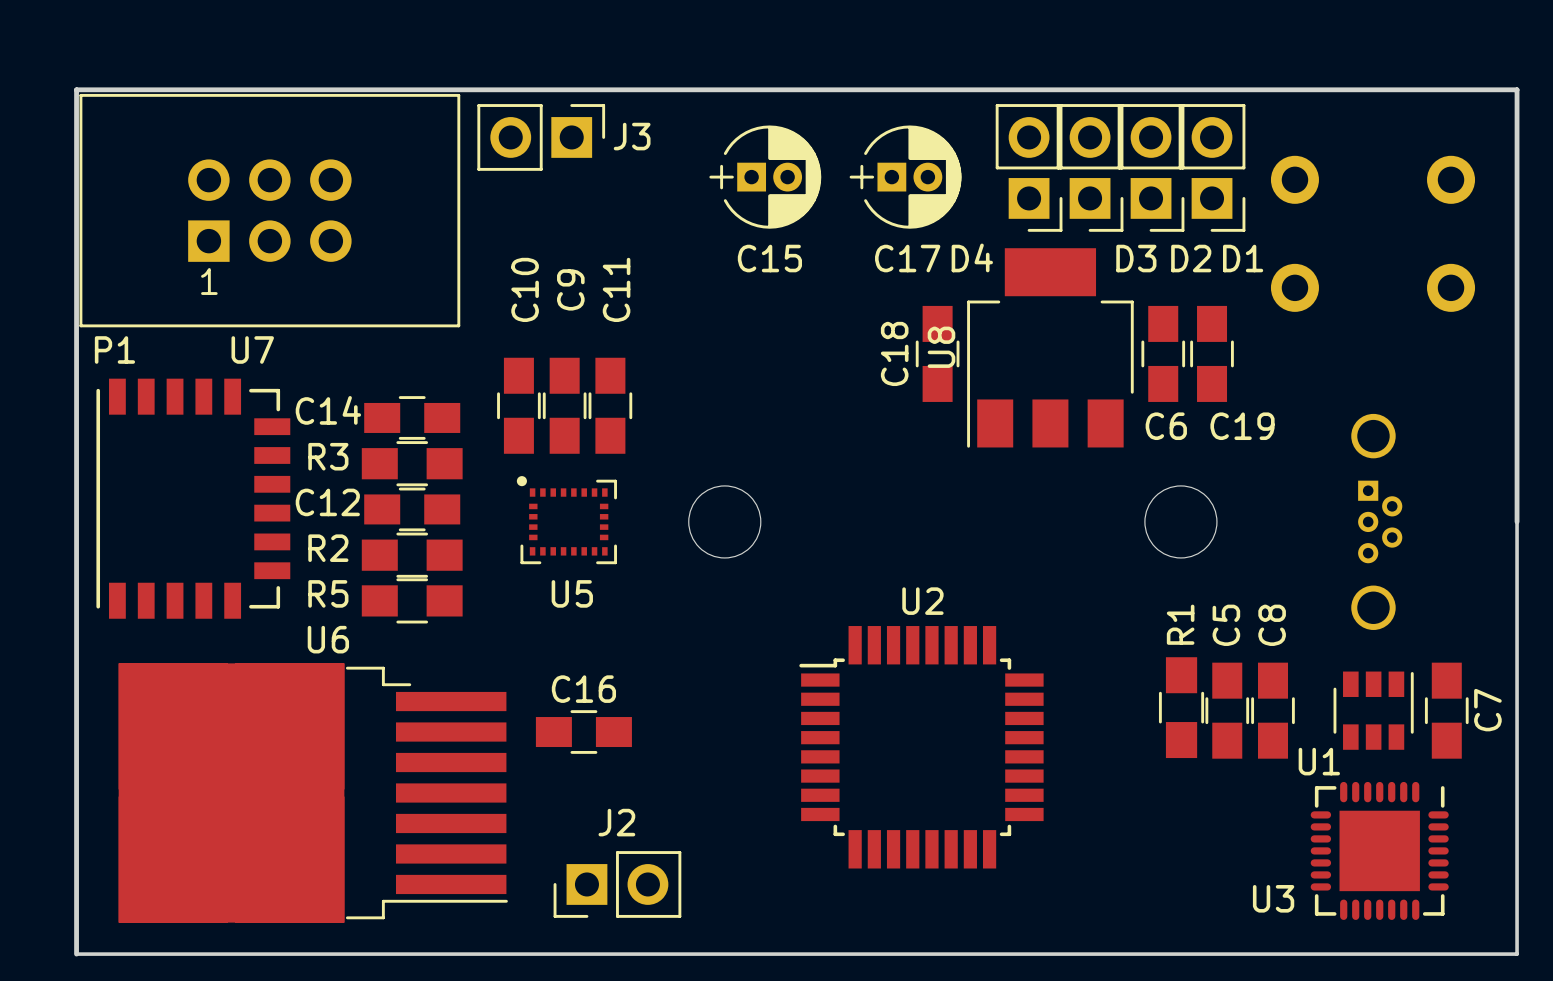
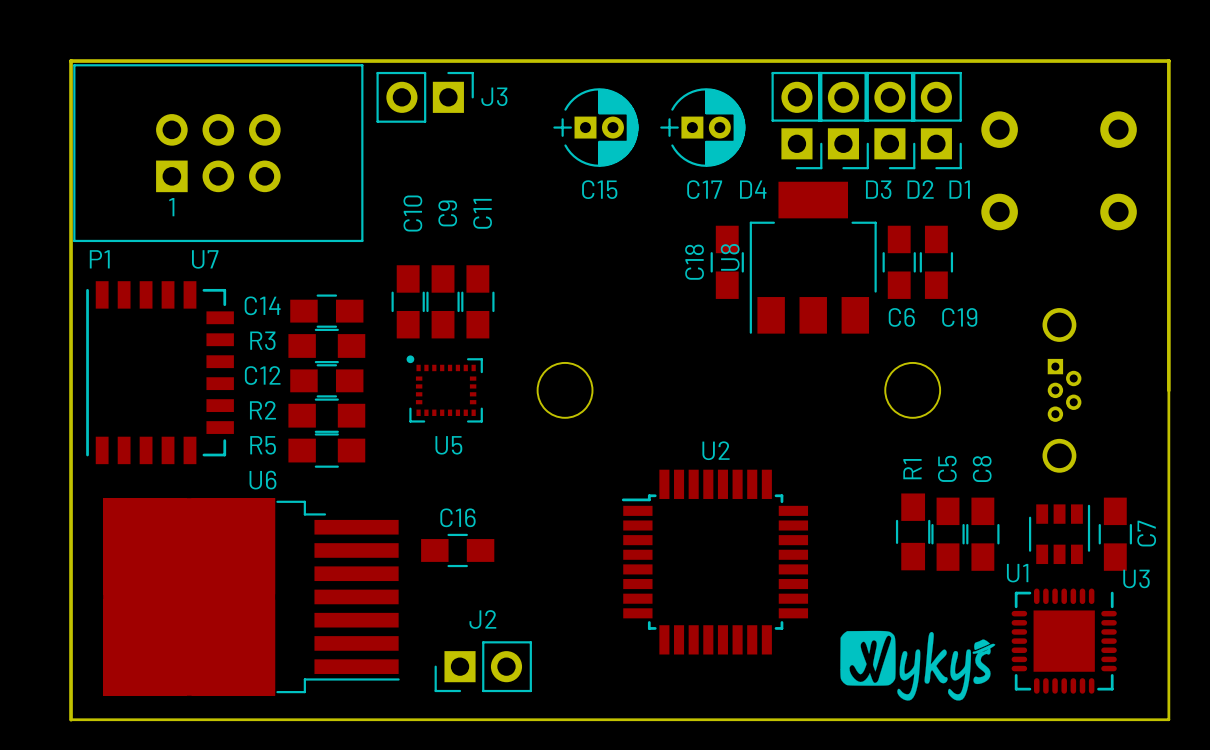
drawing: none -> [840, 630, 996, 701]
U3 name position: U3 (1273, 898) -> U3 (1136, 578)

